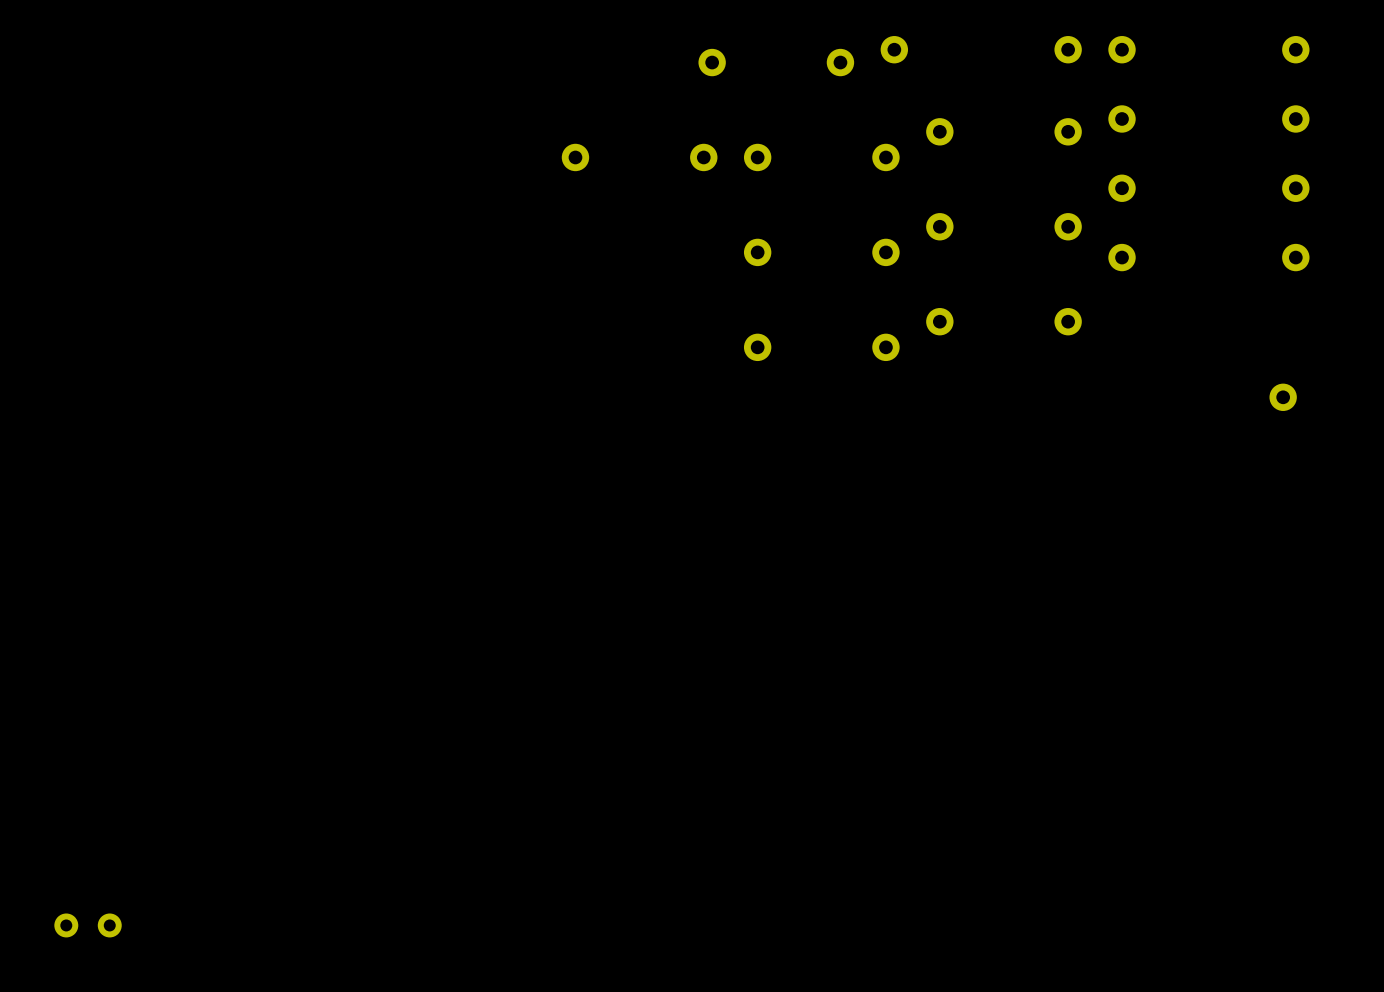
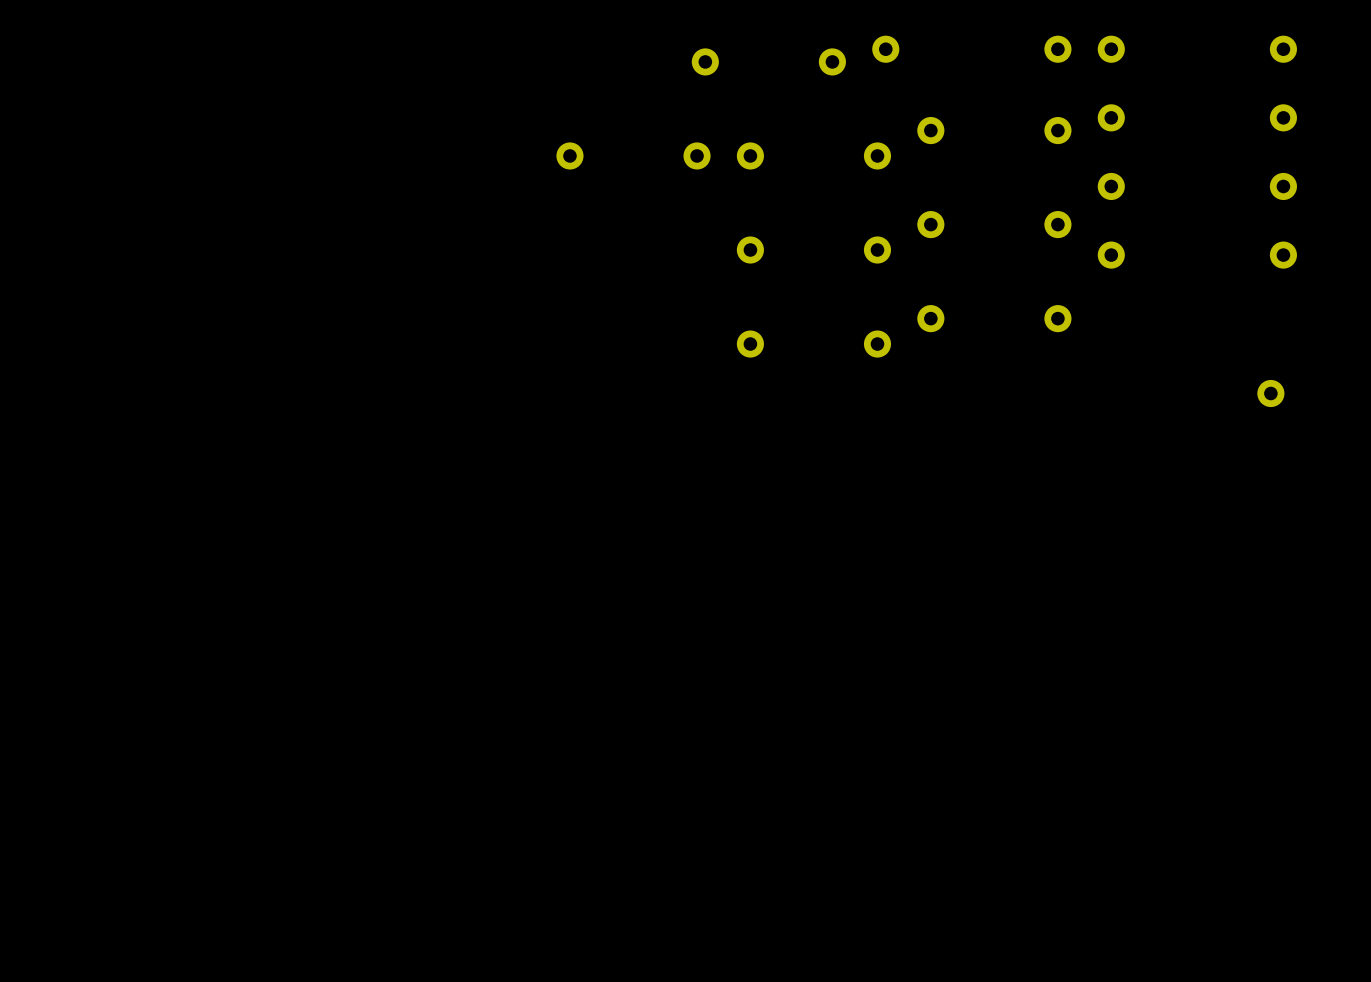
part: (88, 925) -> none

